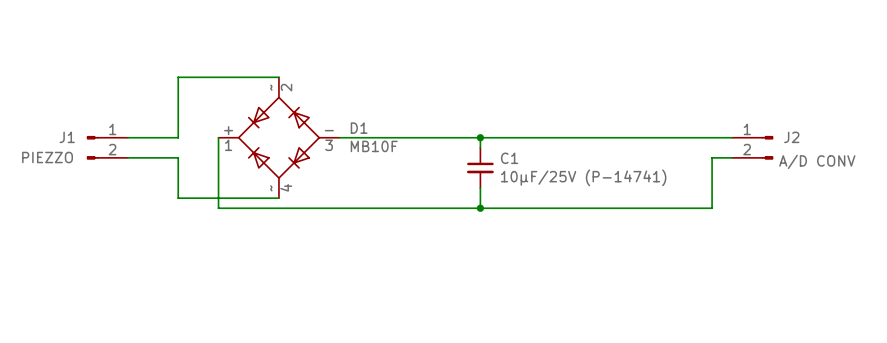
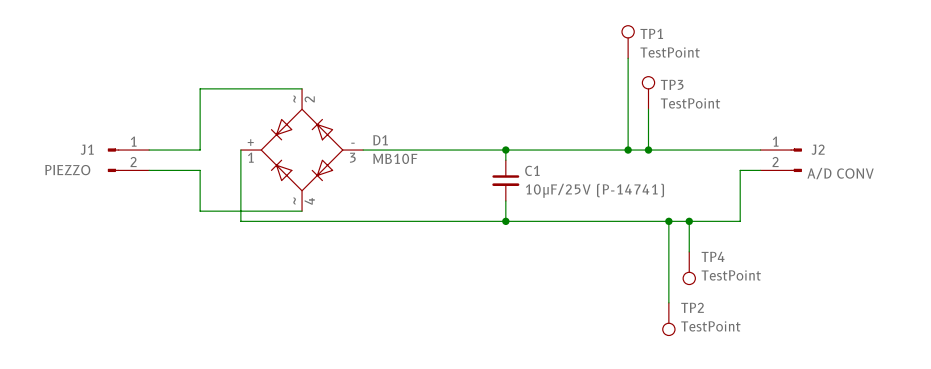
TP1: none -> TestPoint (628, 42)
wire: none -> (628, 58) (628, 150)
TP3: none -> TestPoint (648, 92)
wire: none -> (648, 109) (648, 150)
junction: none -> (628, 150)
junction: none -> (648, 150)
wire: none -> (668, 221) (668, 302)
junction: none -> (668, 221)
wire: none -> (689, 221) (689, 251)
junction: none -> (689, 221)
TP4: none -> TestPoint (689, 268)
TP2: none -> TestPoint (668, 319)

